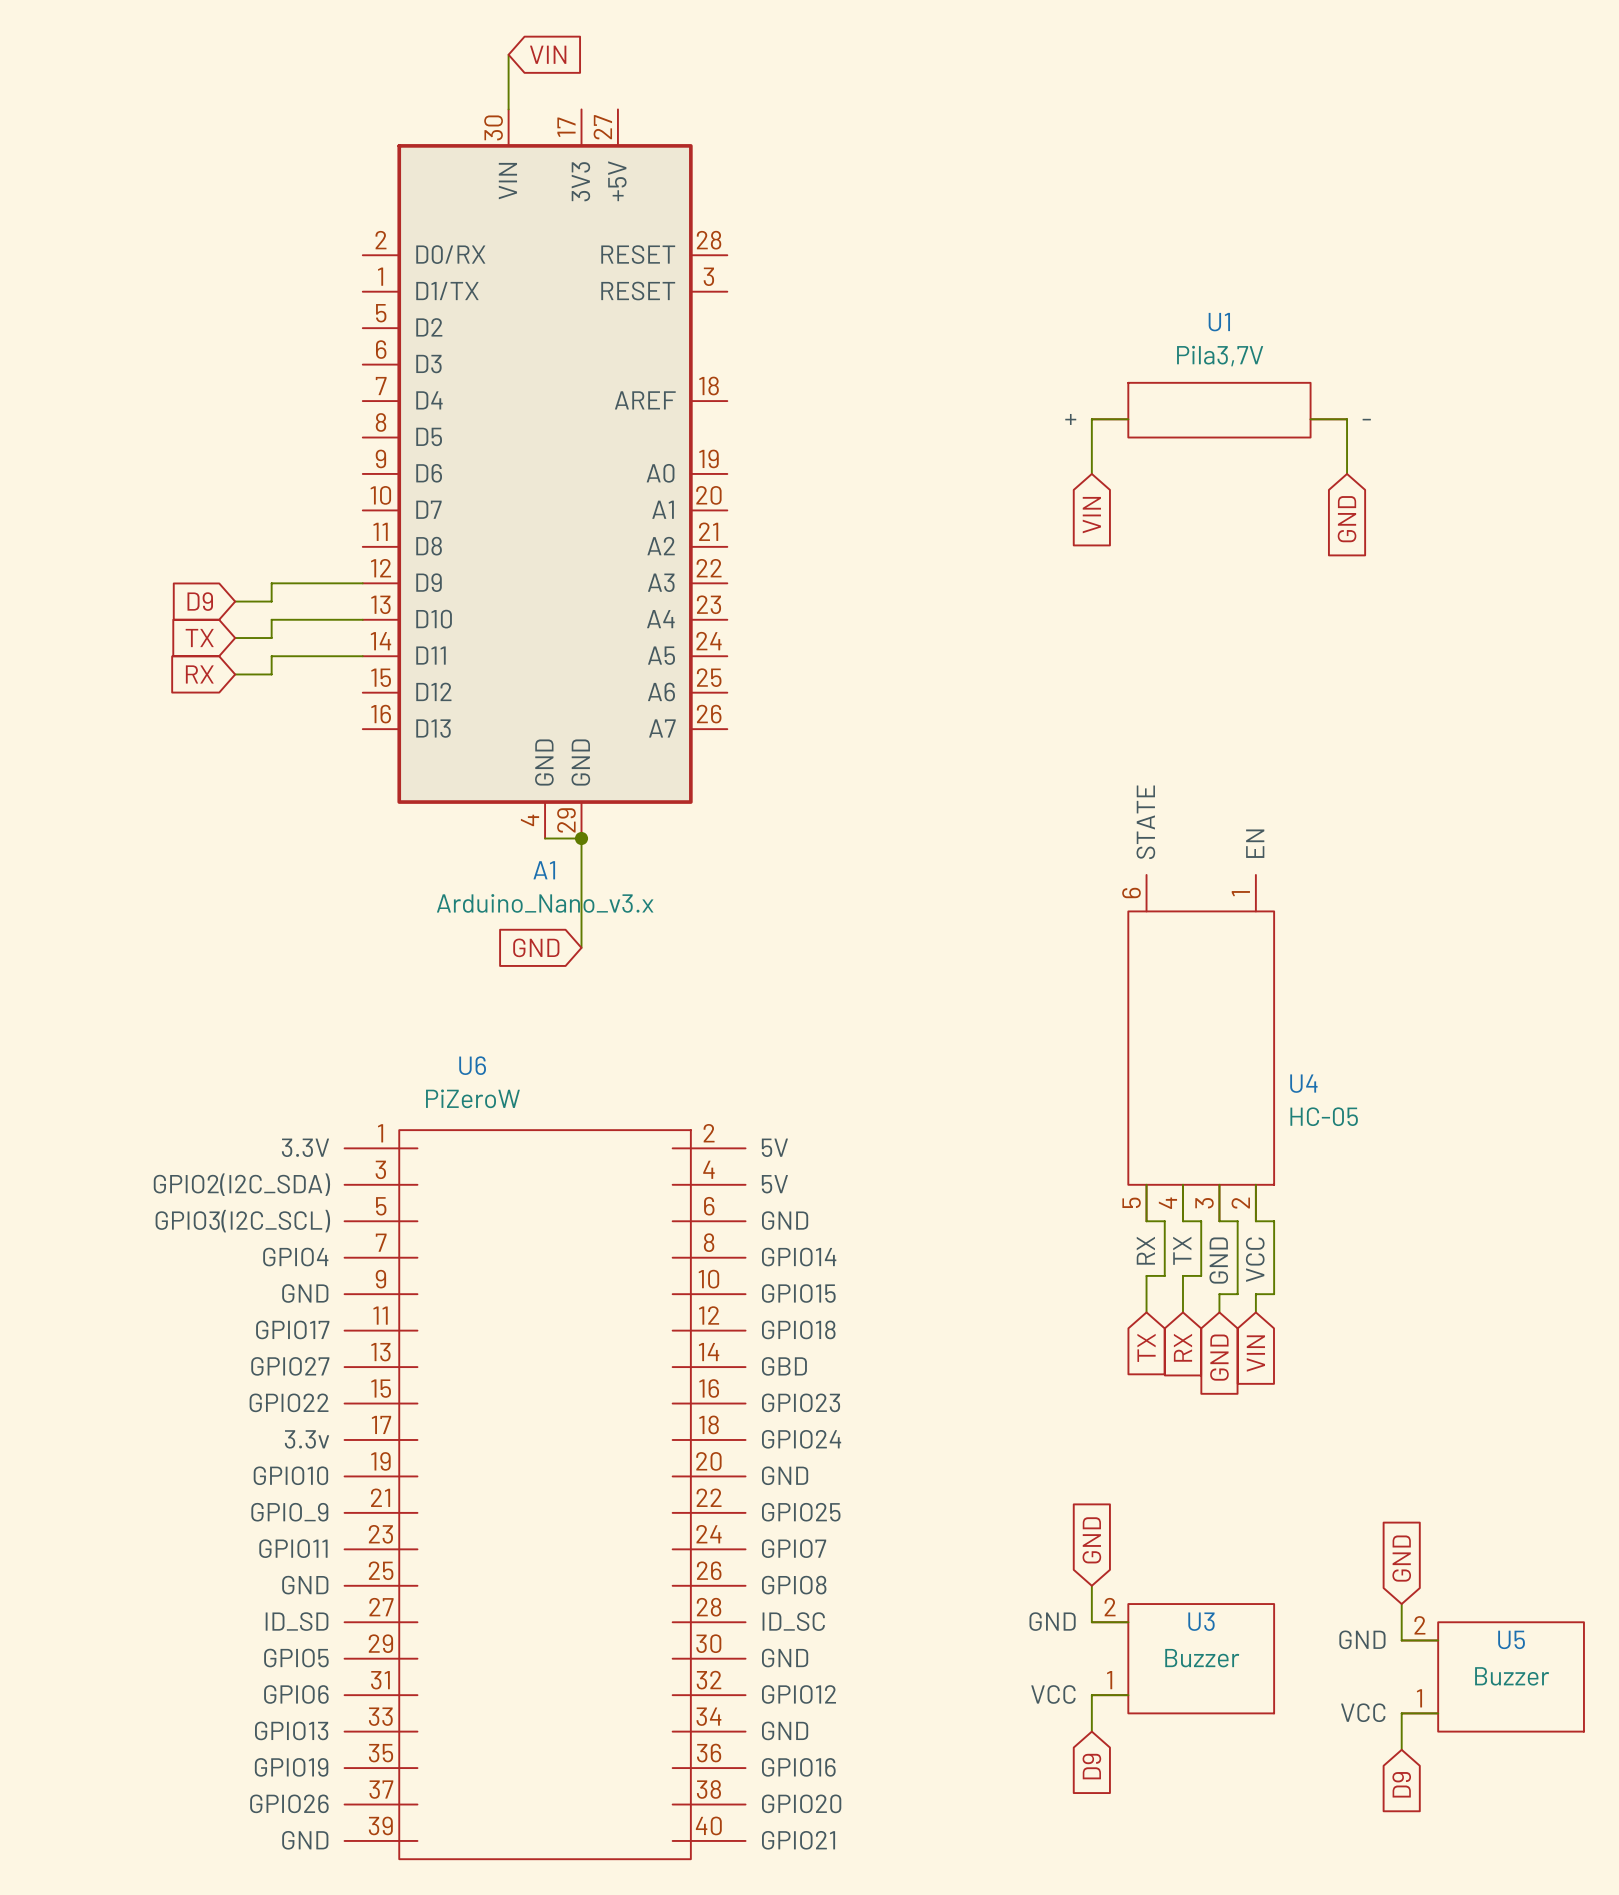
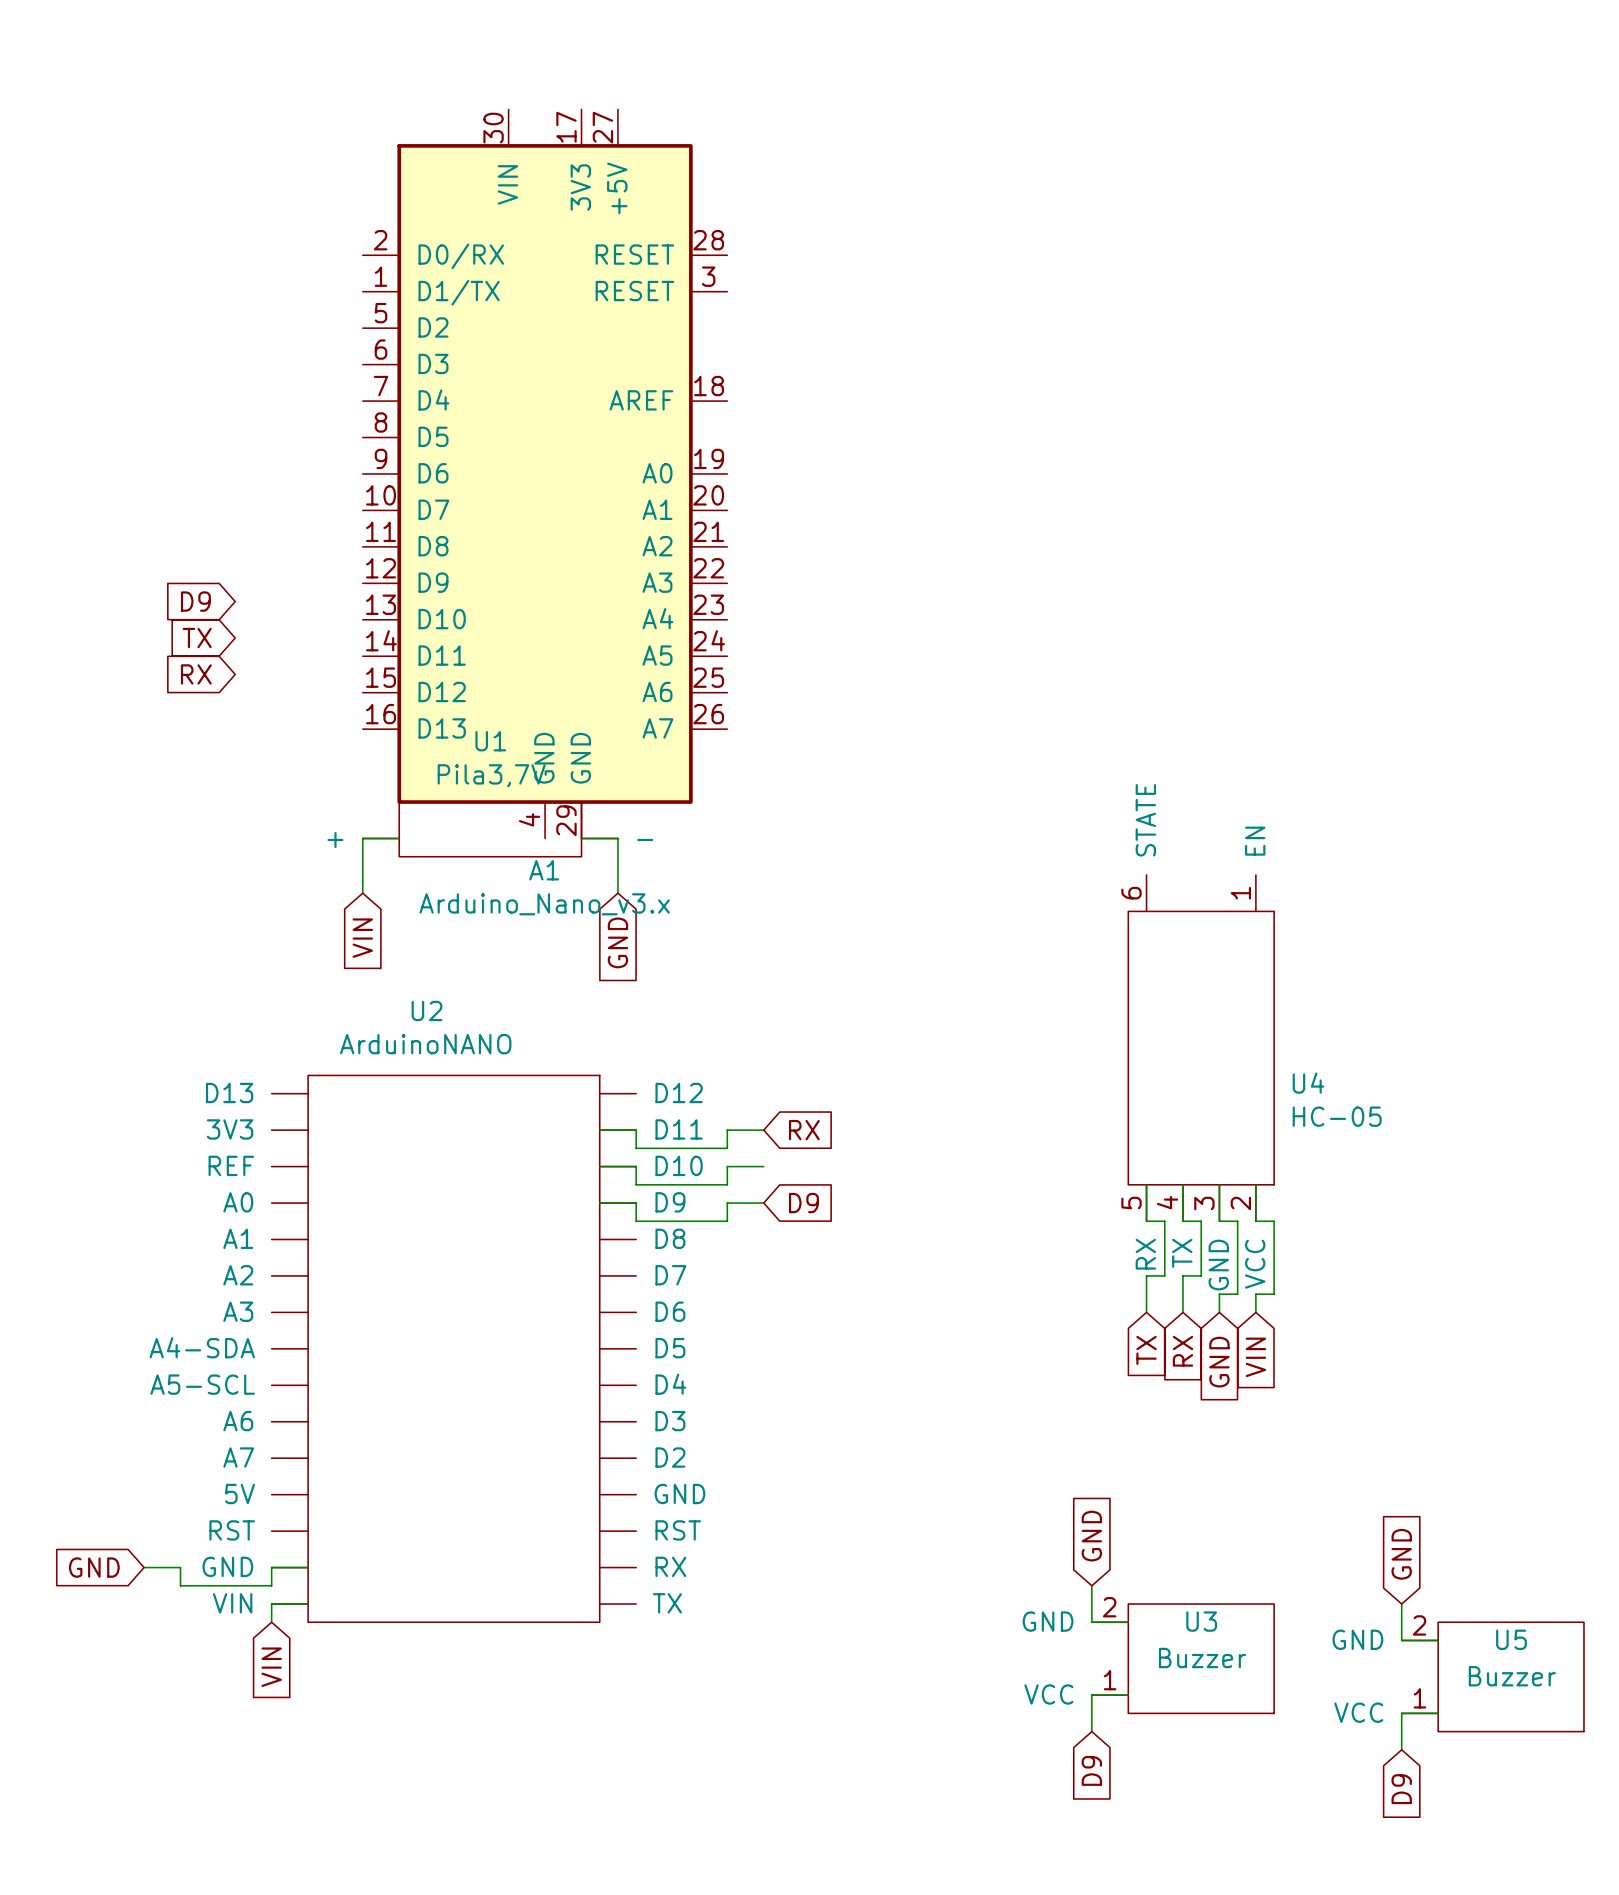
wire: (508, 54) (508, 109) -> none
global label: VIN (548, 54) -> none
U1 position: (1219, 410) -> (490, 829)
wire: (1128, 419) (1091, 419) (1091, 473) -> none
wire: (1310, 419) (1347, 419) (1347, 473) -> none
global label: VIN (1091, 515) -> none
global label: GND (1347, 519) -> none
wire: (362, 583) (271, 583) (271, 601) (235, 601) -> none
wire: (362, 619) (271, 619) (271, 638) (235, 638) -> none
wire: (362, 656) (271, 656) (271, 674) (235, 674) -> none
wire: none -> (399, 838) (362, 838) (362, 893)
wire: (545, 838) (581, 838) (581, 947) -> none
wire: none -> (581, 838) (617, 838) (617, 893)
junction: (581, 838) -> none
global label: none -> VIN (362, 938)
global label rotation: 0° (536, 947) -> 90° counterclockwise (617, 942)
wire: none -> (599, 1130) (636, 1130) (636, 1148) (727, 1148) (727, 1130) (763, 1130)
global label: none -> RX (804, 1130)
wire: none -> (599, 1166) (636, 1166) (636, 1184) (727, 1184) (727, 1166) (763, 1166)
wire: none -> (599, 1203) (636, 1203) (636, 1221) (727, 1221) (727, 1203) (763, 1203)
global label: none -> D9 (803, 1203)
U2: none -> ArduinoNANO (453, 1348)
U6: PiZeroW (545, 1494) -> none
global label: none -> GND (94, 1567)
wire: none -> (144, 1567) (180, 1567) (180, 1585) (271, 1585) (271, 1567) (308, 1567)
wire: none -> (308, 1604) (271, 1604) (271, 1622)
global label: none -> VIN (271, 1667)

